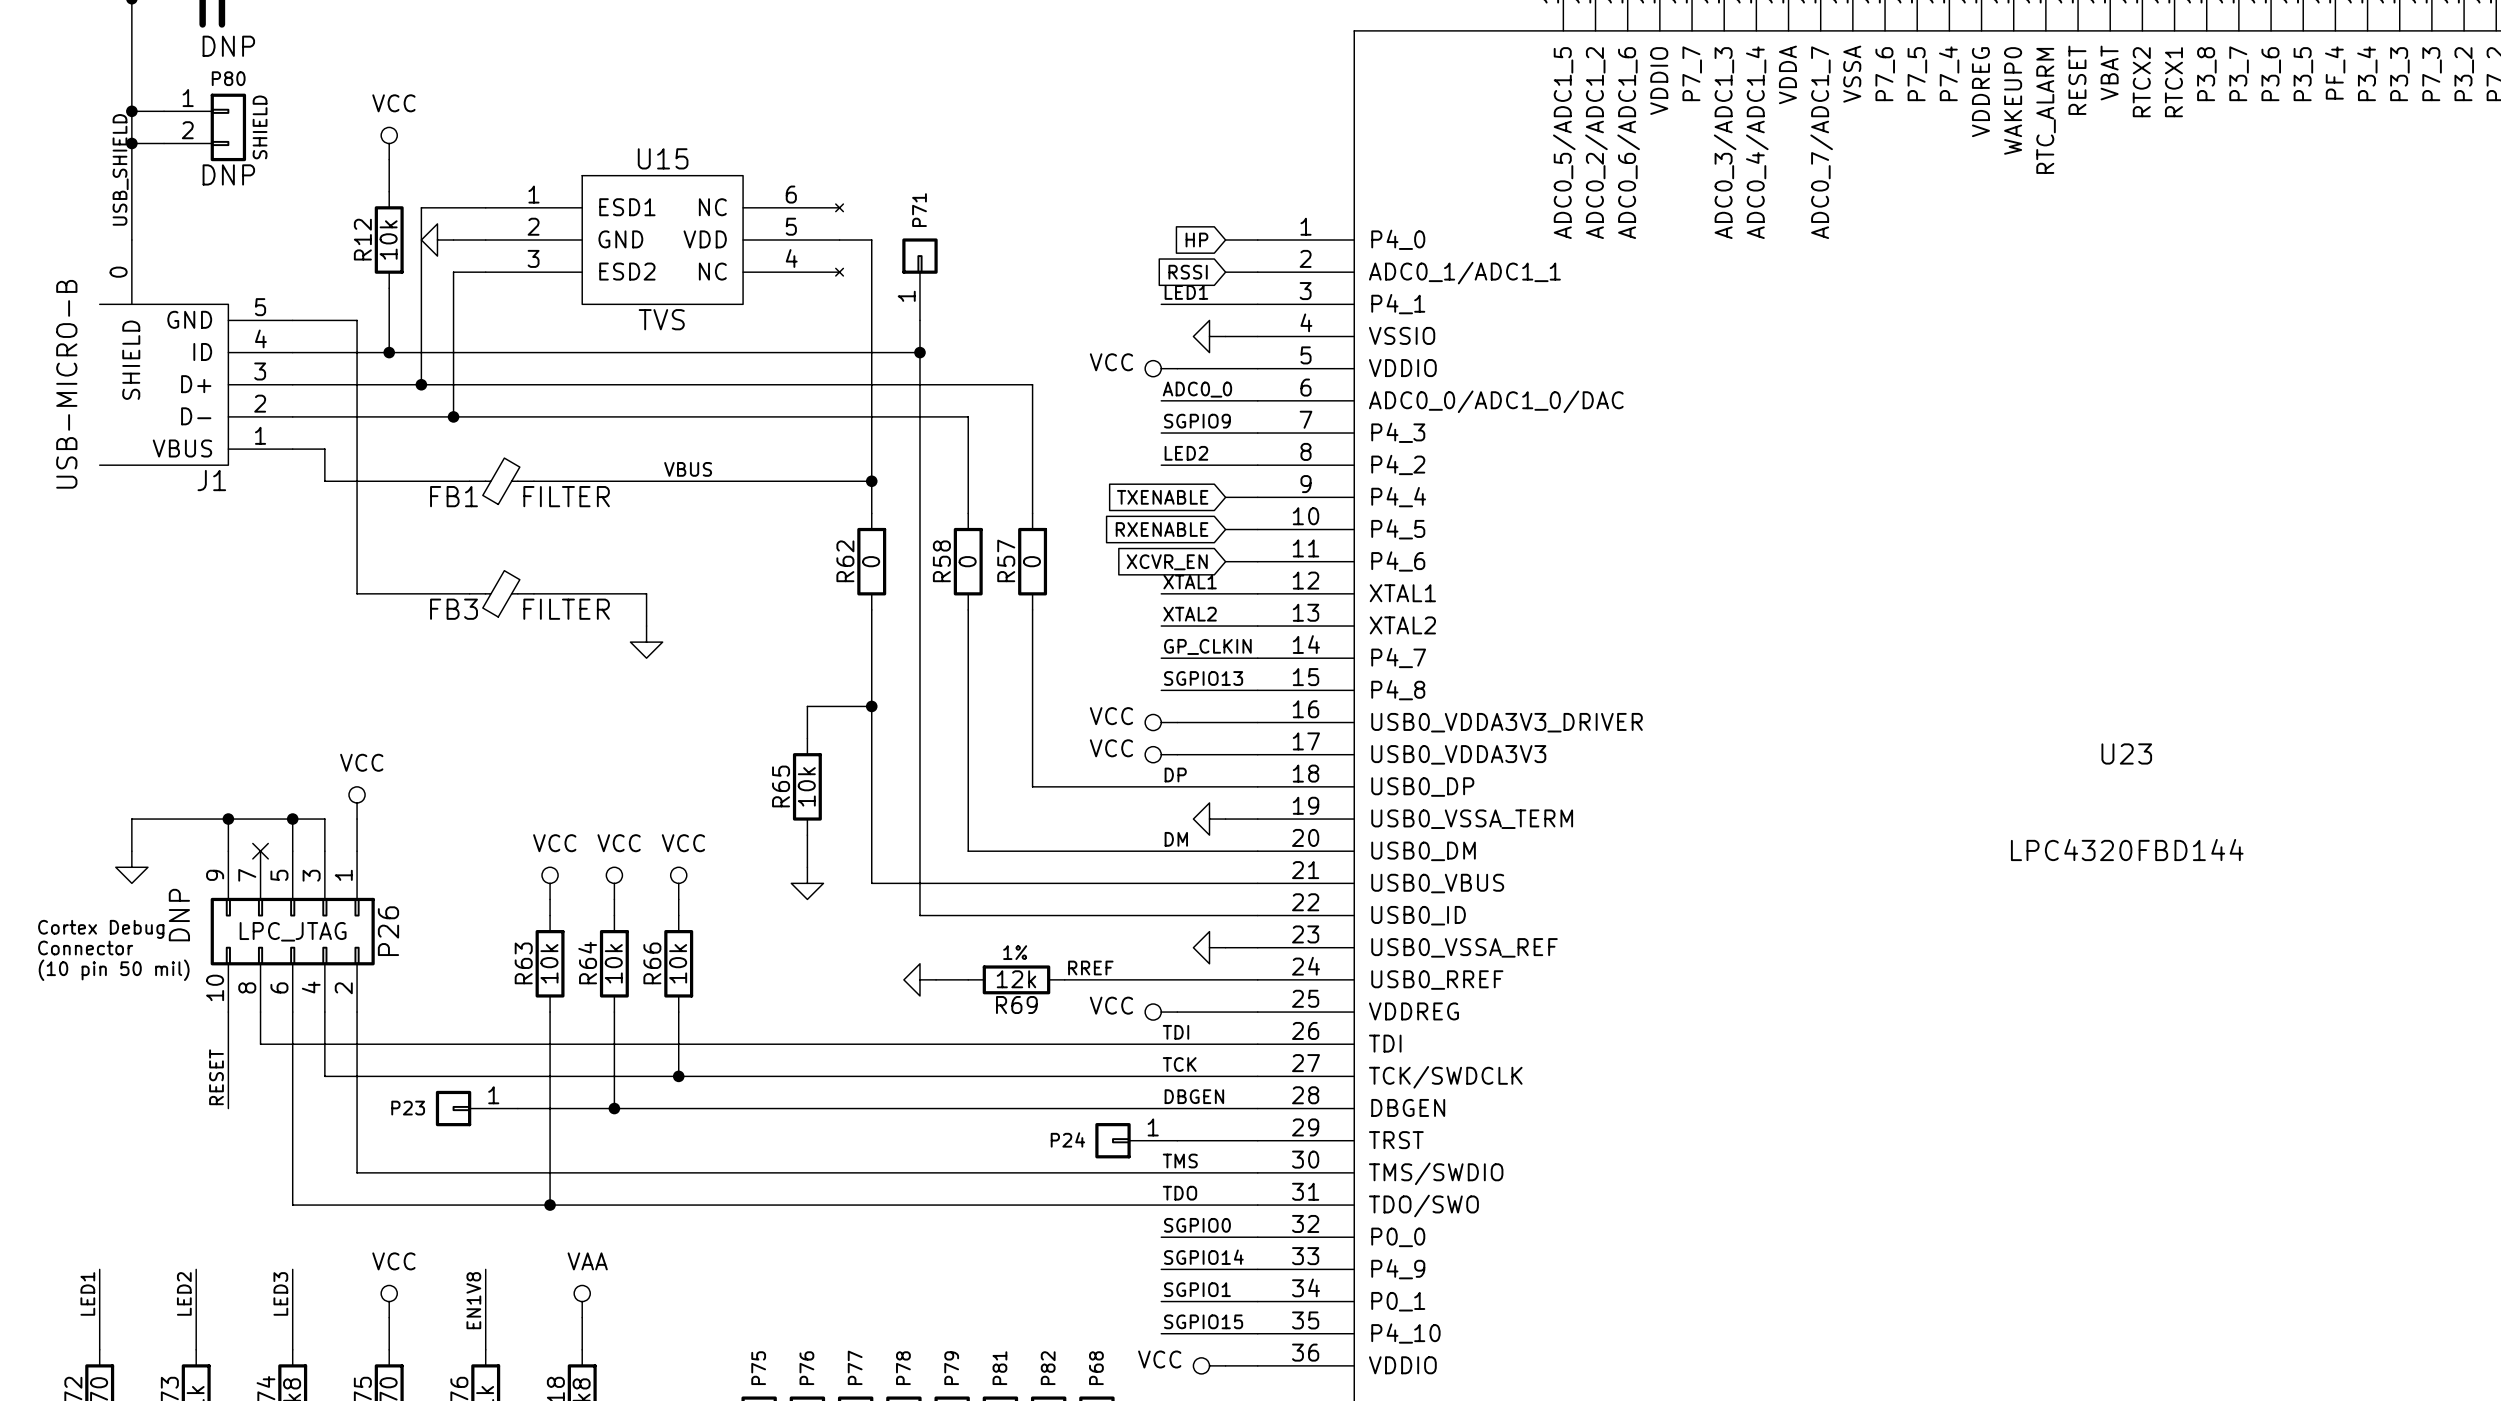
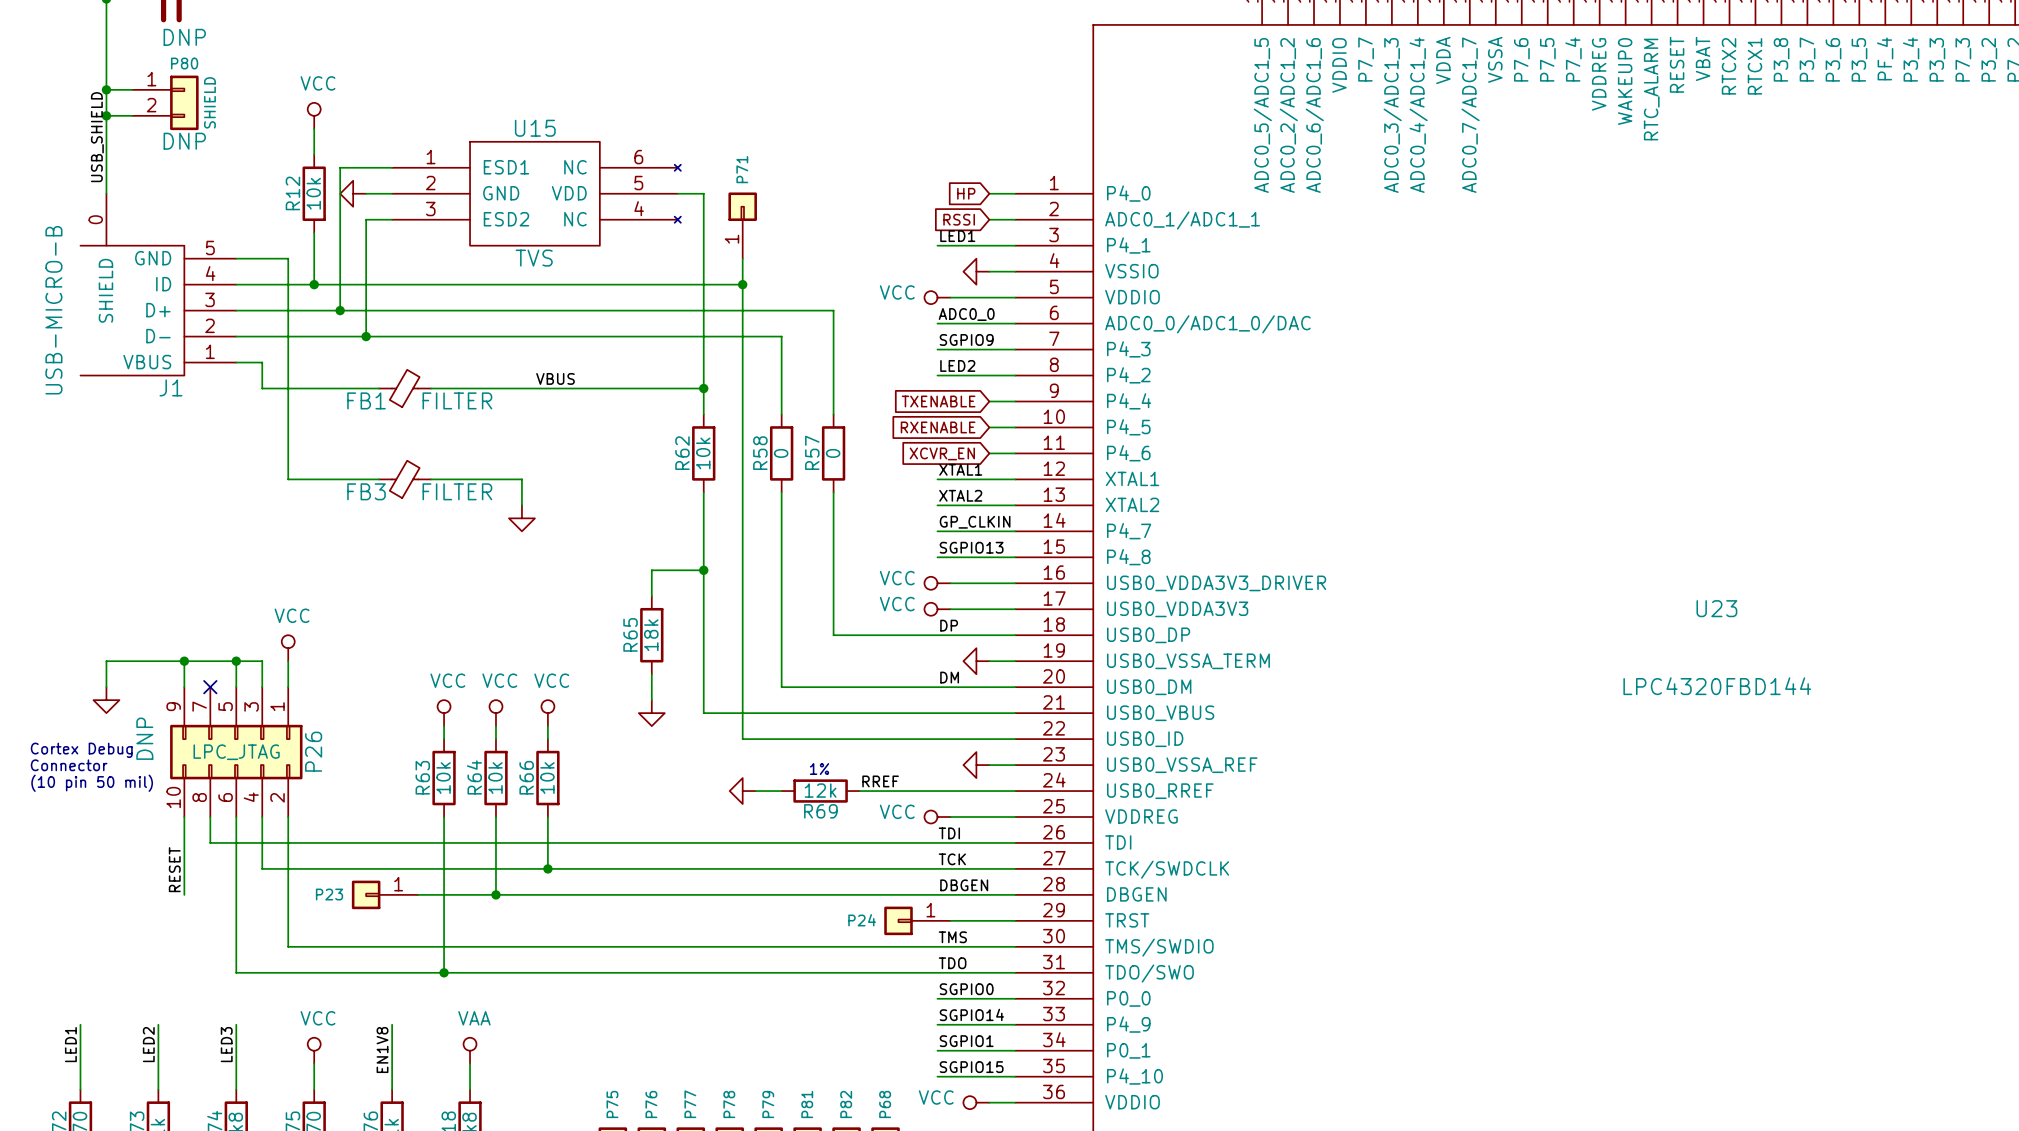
R62 value: 0 (871, 561) -> 10k (703, 453)
R65 value: 10k (806, 786) -> 18k (651, 635)

